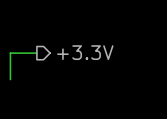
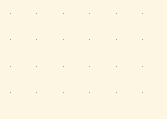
hierarchical label: +3.3V (85, 52) -> none
wire: (36, 53) (10, 53) (10, 79) -> none

